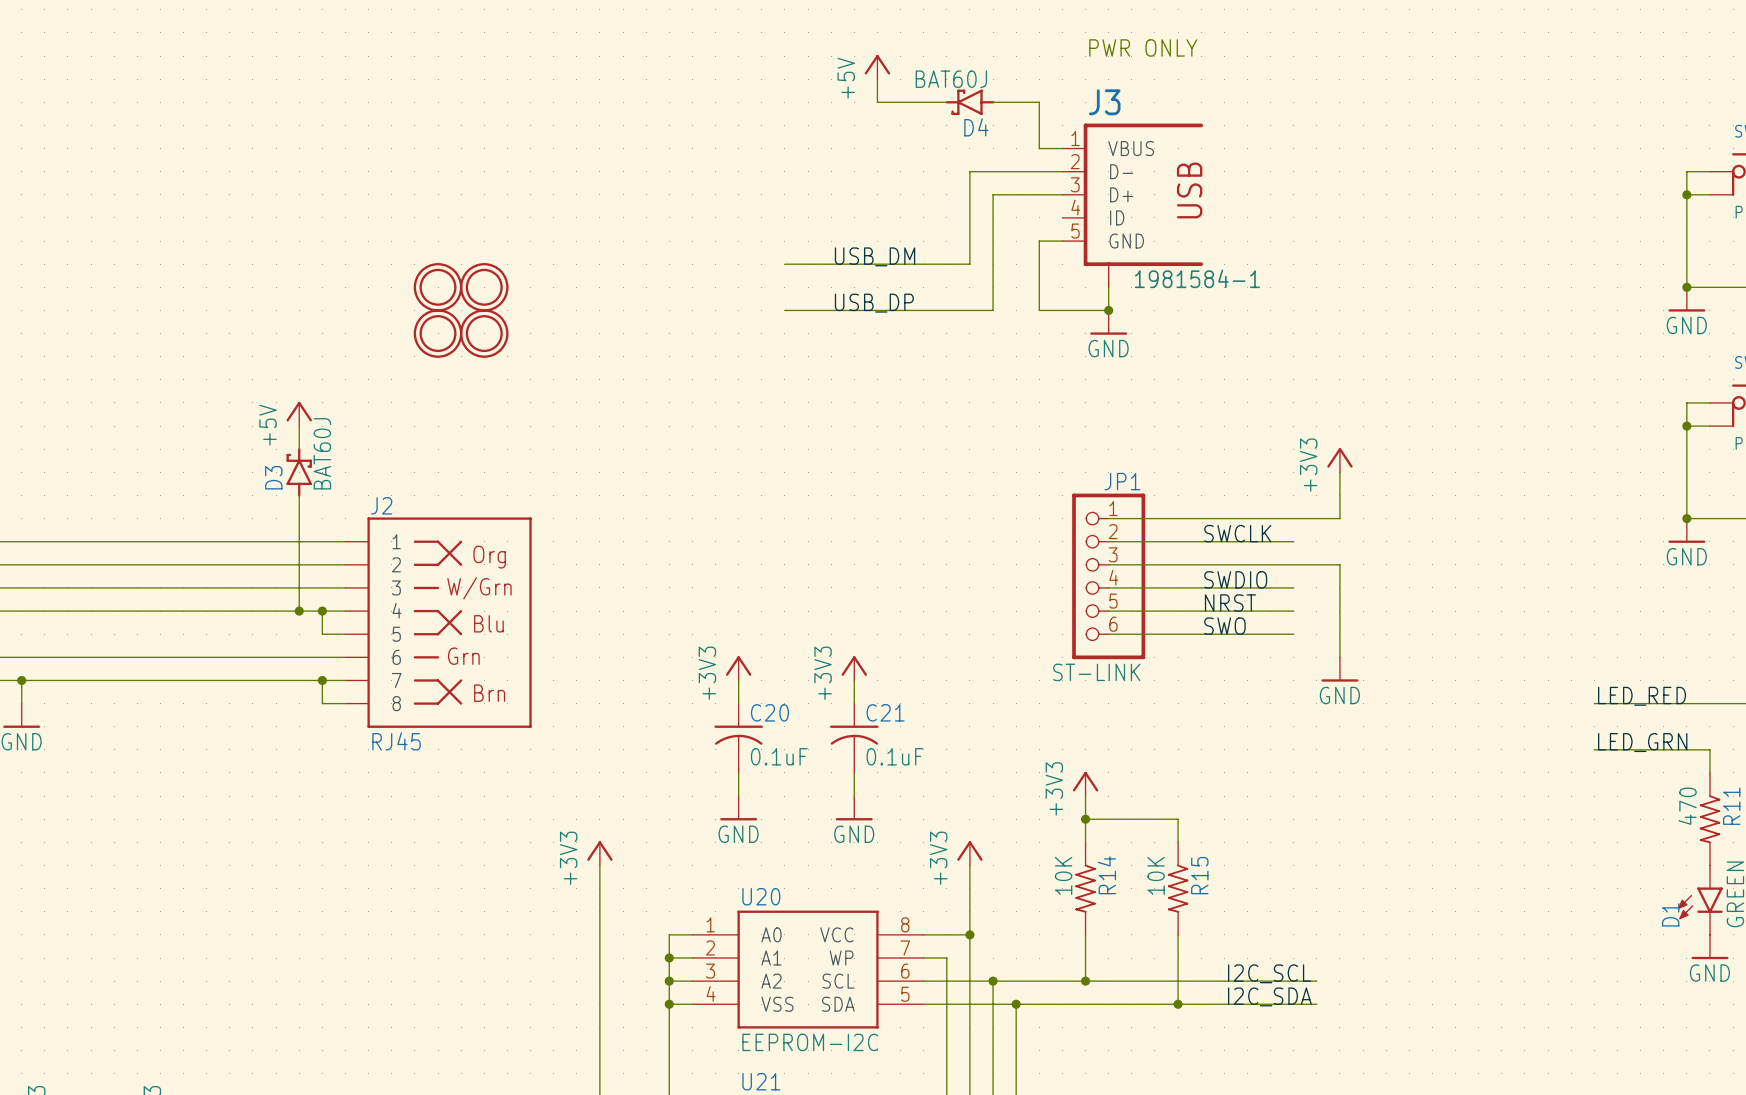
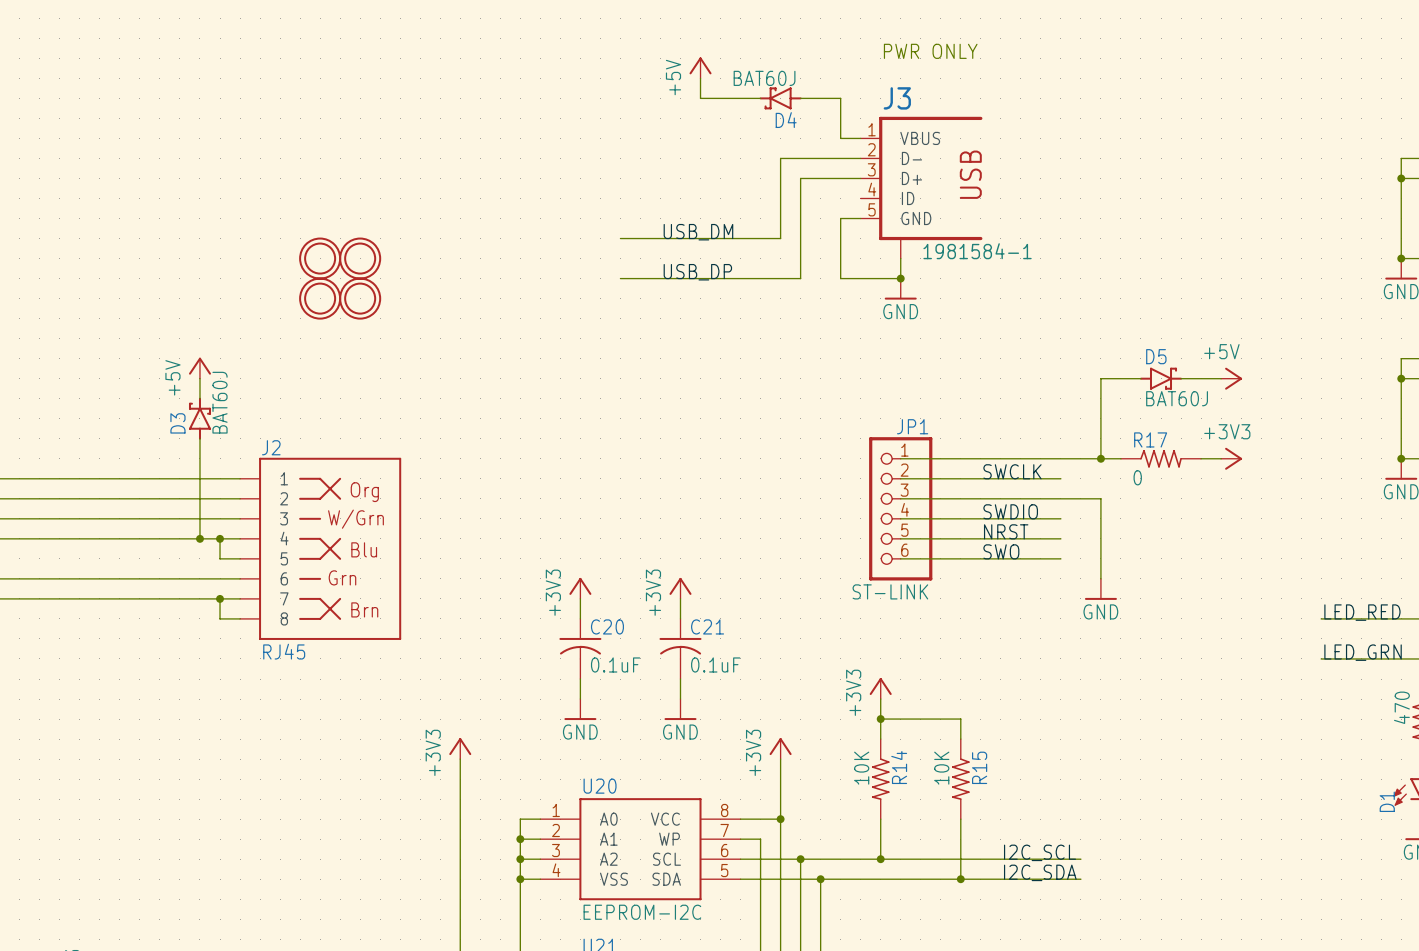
wire: none -> (1140, 378) (1100, 378) (1100, 418)
D5: none -> BAT60J (1161, 378)
wire: none -> (1181, 378) (1221, 378)
power symbol: none -> +5V (1231, 378)
power symbol rotation: 0° (1339, 457) -> 90° clockwise (1233, 458)
power symbol position: +3V3 (1339, 460) -> +3V3 (1231, 458)
wire: none -> (1100, 458) (1120, 458)
junction: none -> (1100, 458)
R17: none -> 0 (1161, 458)
wire: none -> (1201, 458) (1221, 458)

